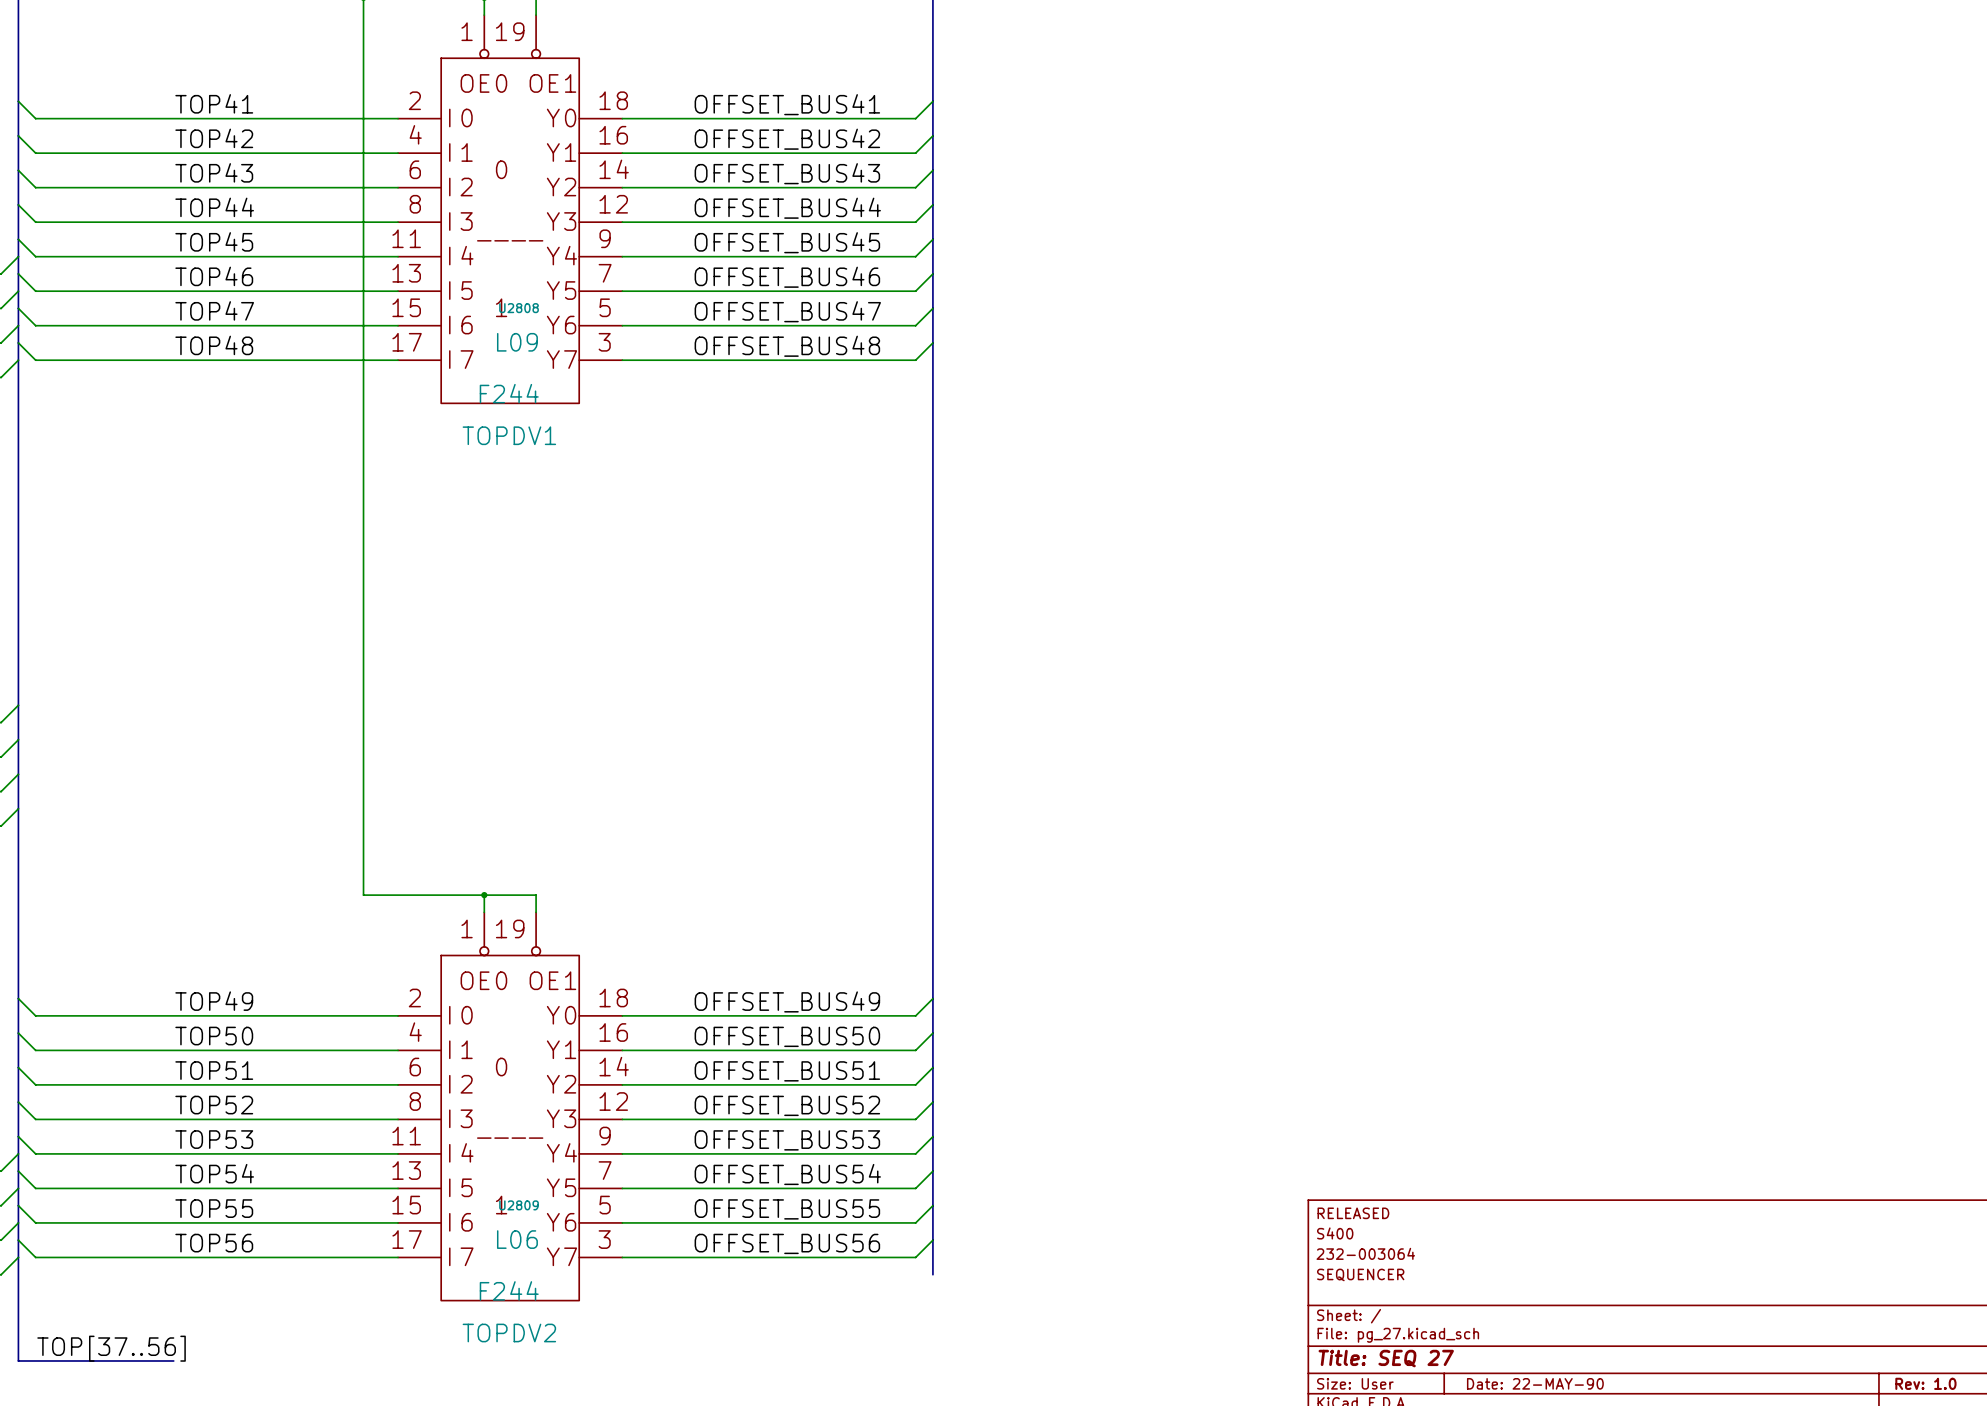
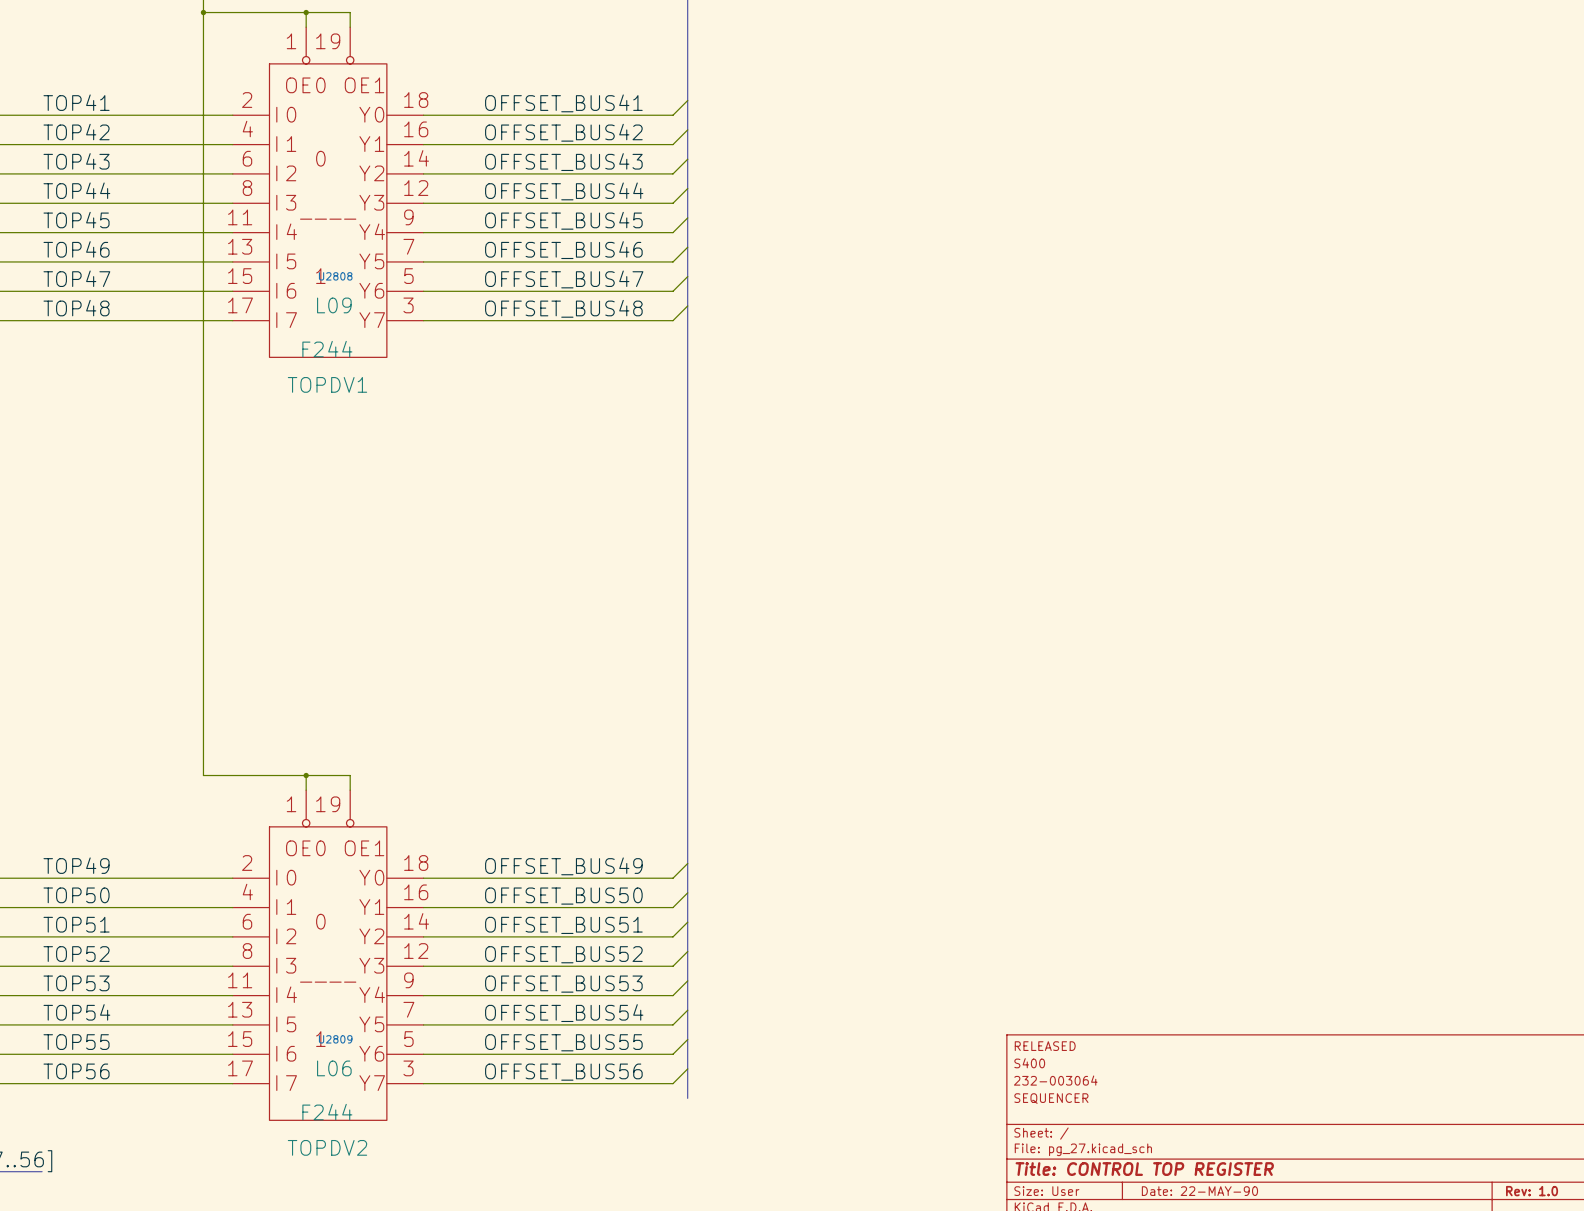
title block: Title: SEQ 27 (1386, 1358) -> Title: CONTROL TOP REGISTER (1144, 1169)

